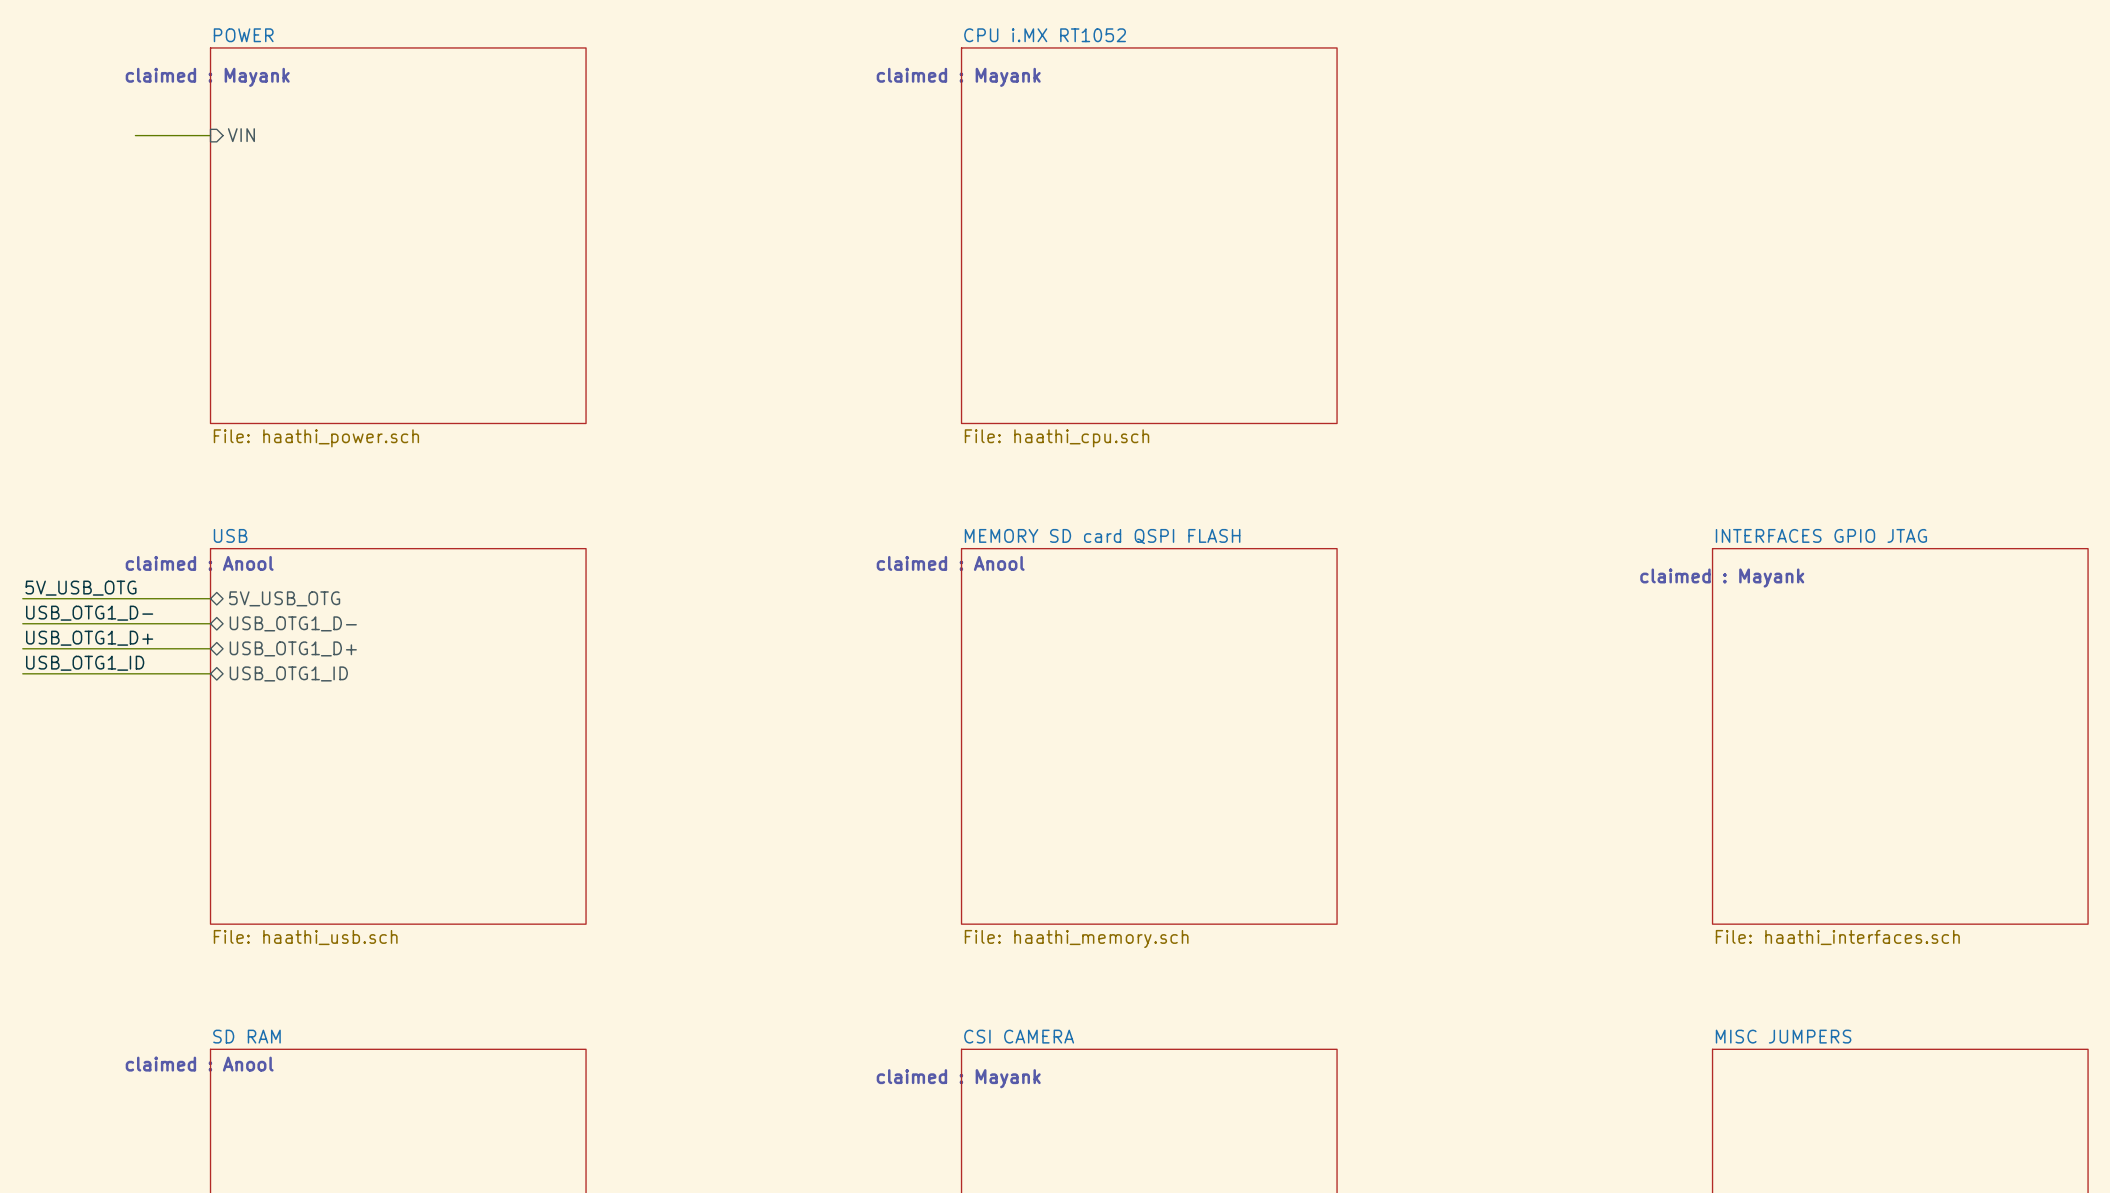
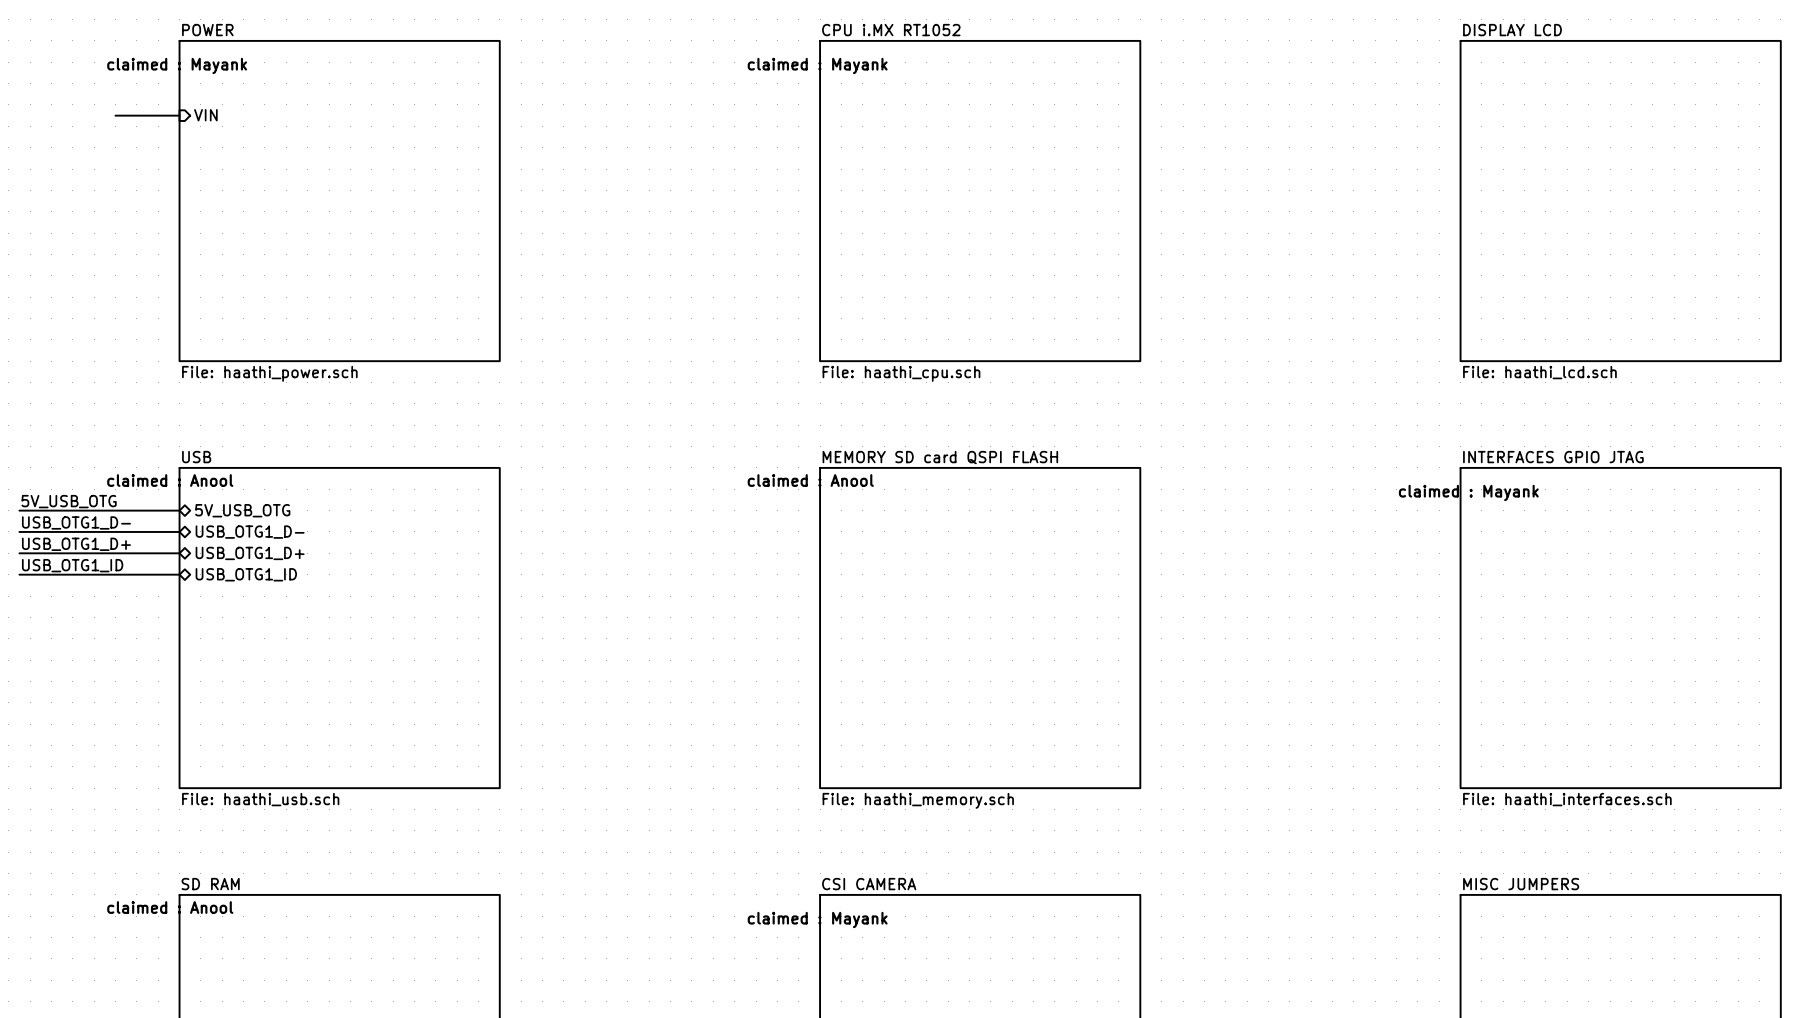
sheet DISPLAY LCD: none -> File: haathi_lcd.sch (1620, 201)

